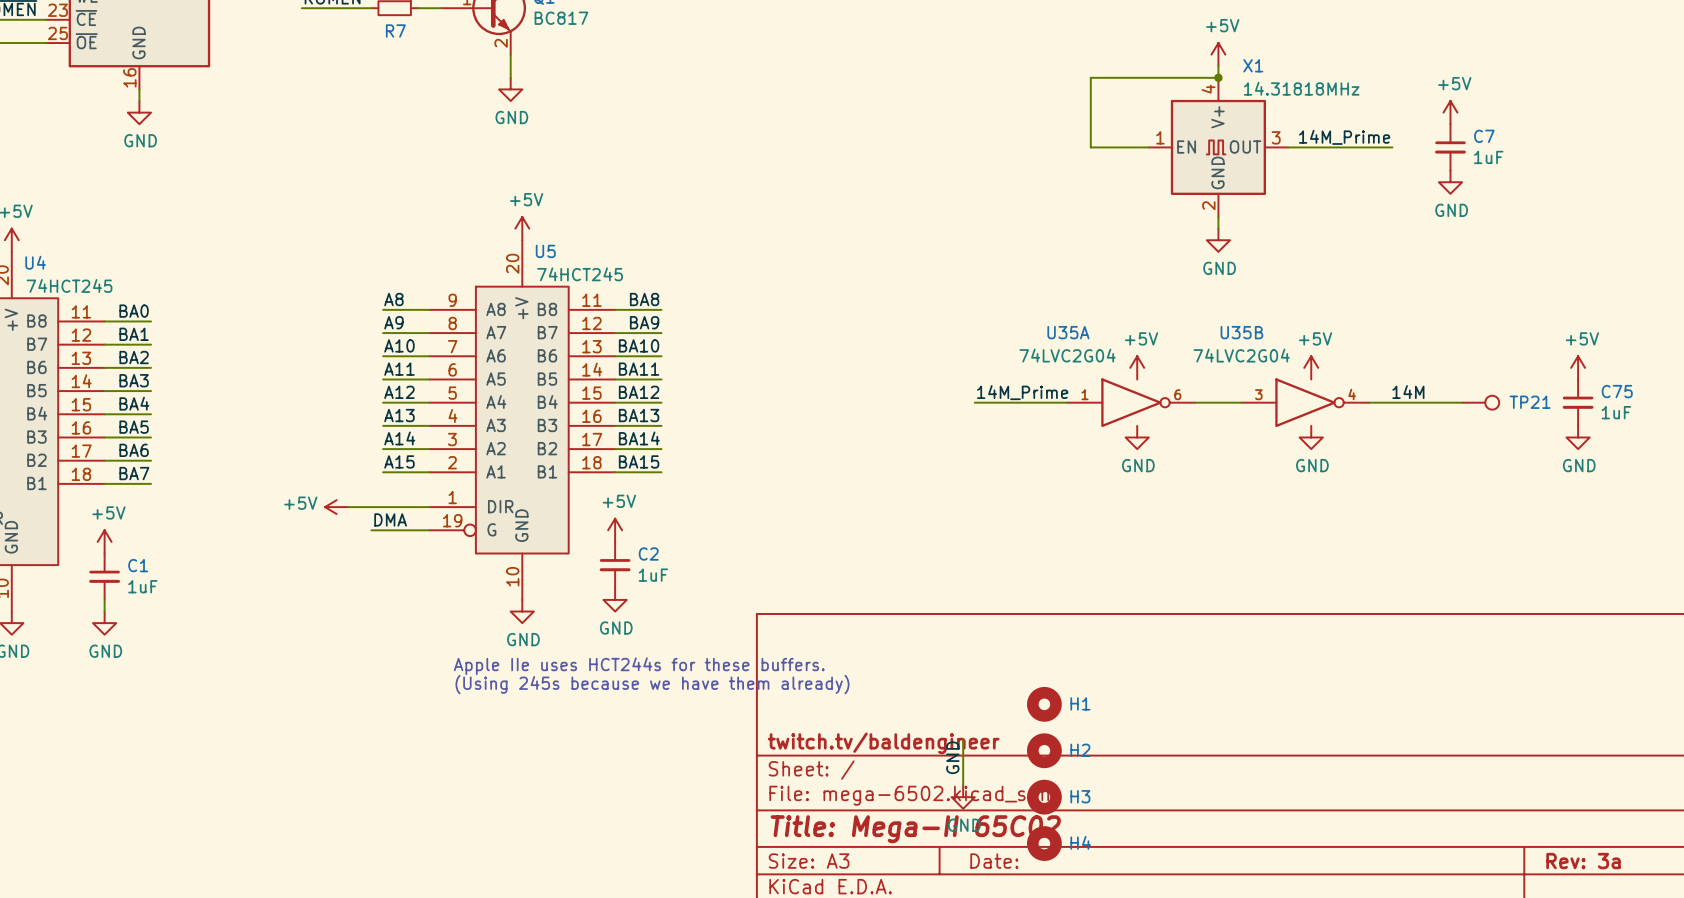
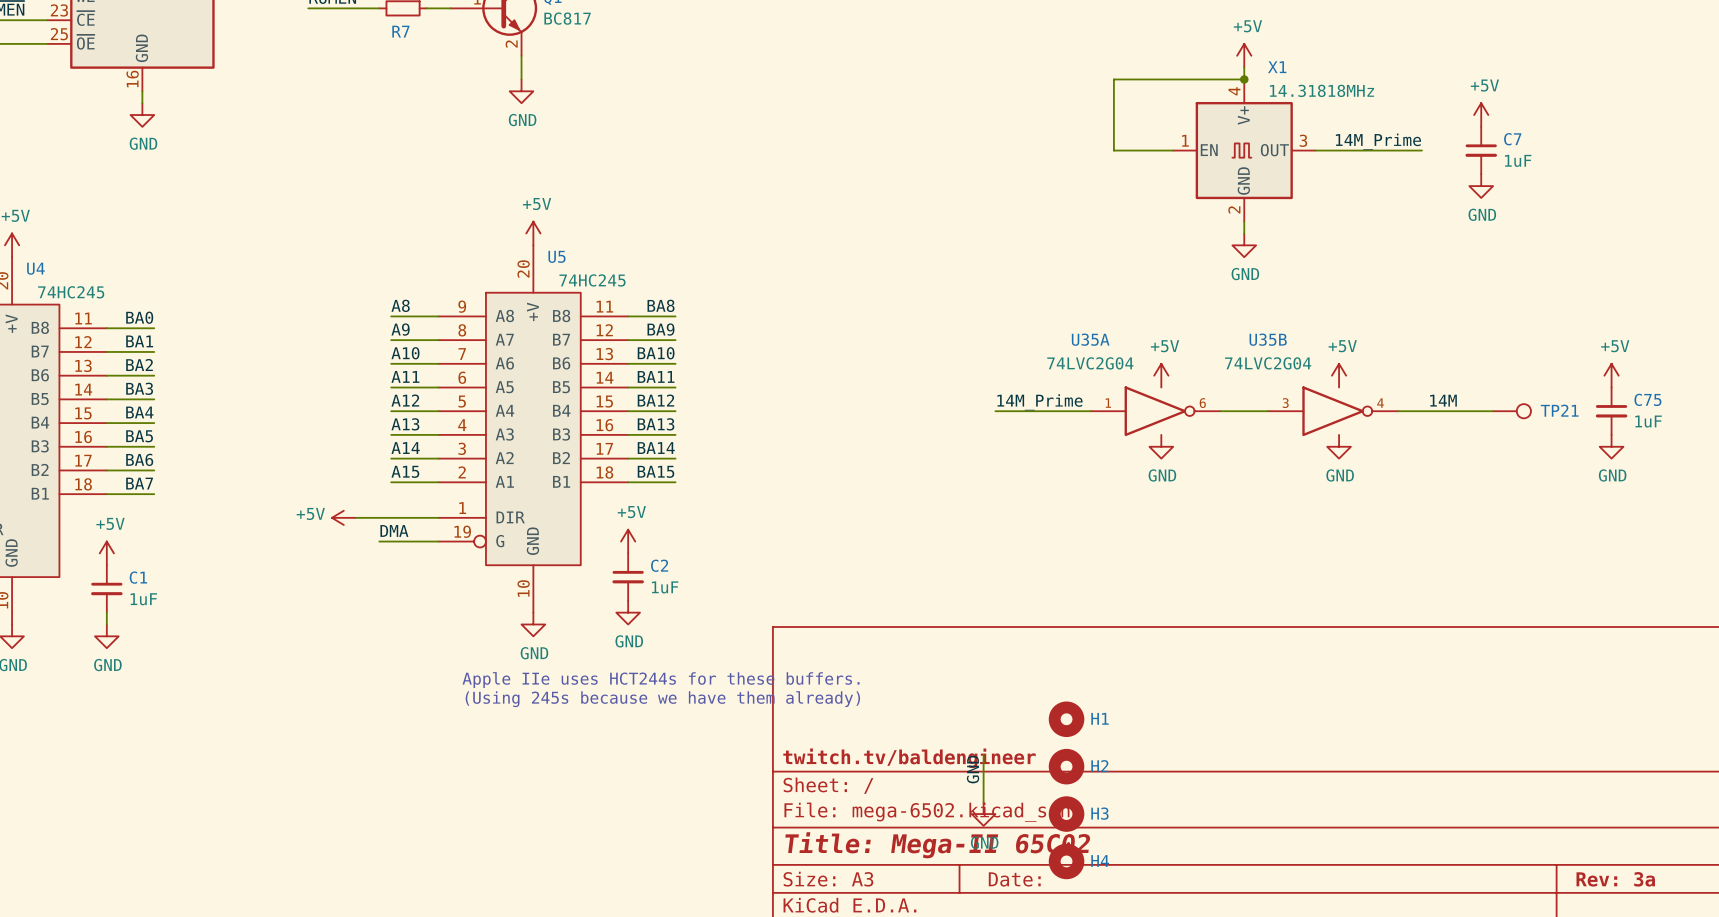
U5 value: 74HCT245 (580, 274) -> 74HC245 (592, 280)
U4 value: 74HCT245 (69, 285) -> 74HC245 (71, 292)

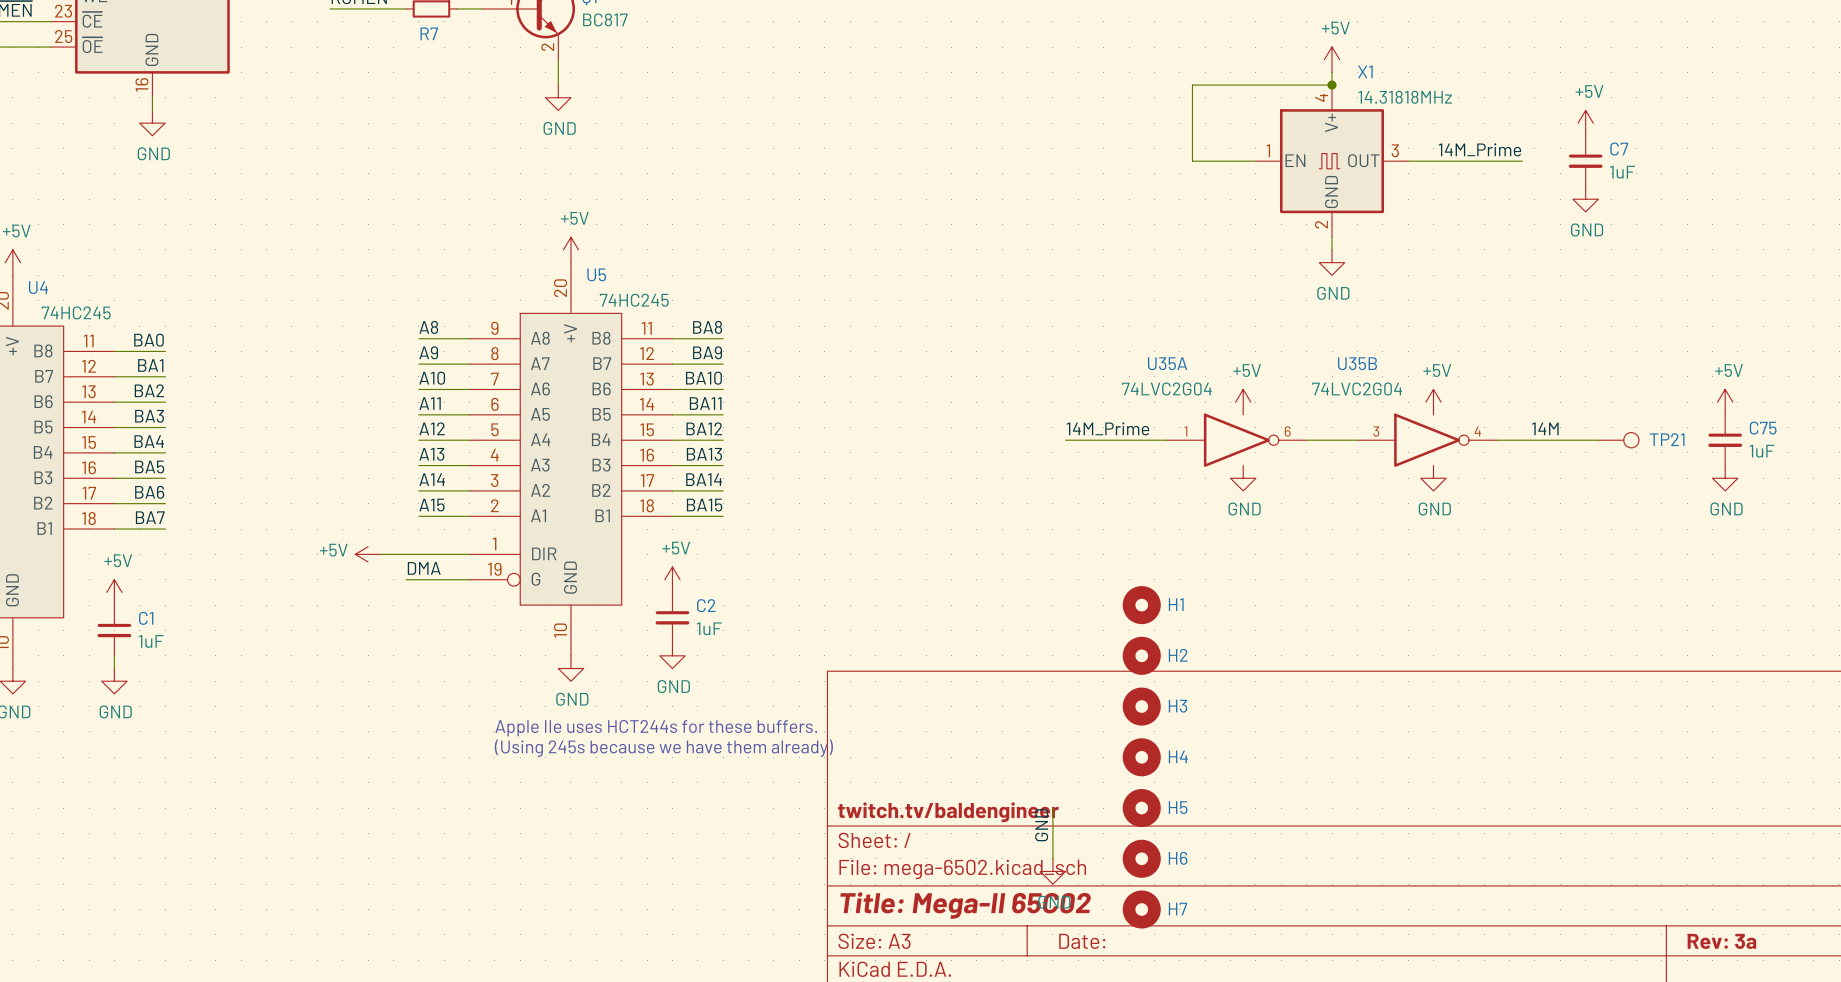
H1 position: (1066, 719) -> (1141, 605)
H5: none -> (1141, 808)
H2 position: (1066, 766) -> (1141, 655)
H6: none -> (1141, 858)
H3 position: (1066, 814) -> (1141, 706)
H7: none -> (1141, 909)
H4 position: (1066, 861) -> (1141, 757)

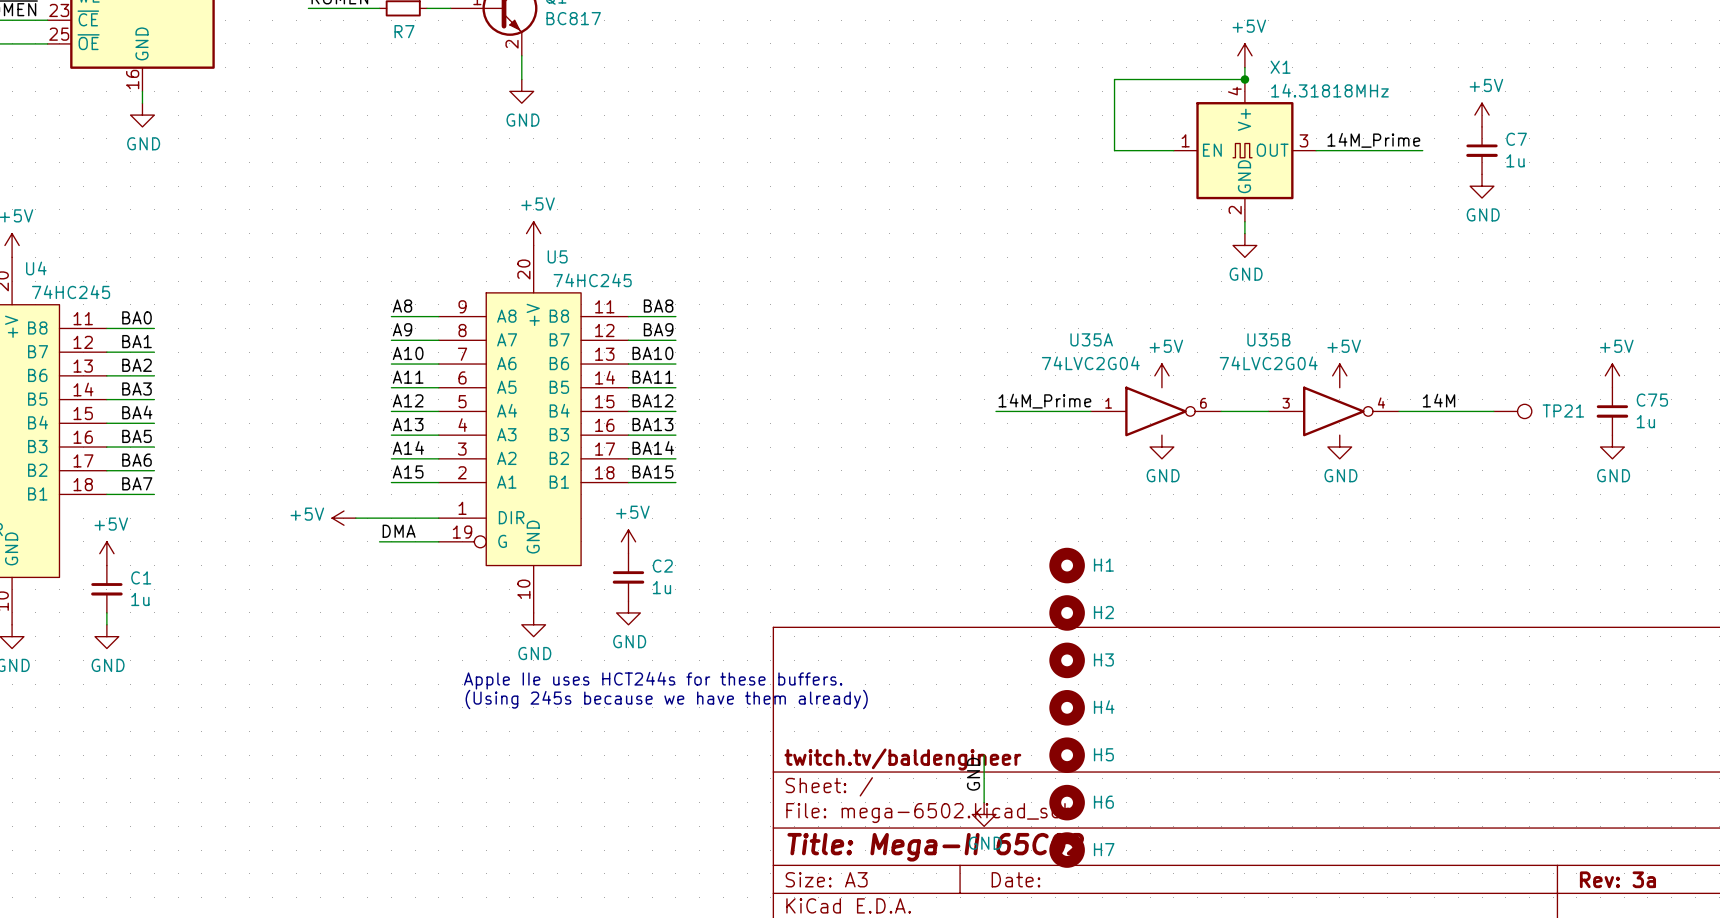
C7 value: 1uF (1622, 172) -> 1u (1515, 160)
C75 value: 1uF (1762, 451) -> 1u (1645, 421)
C2 value: 1uF (709, 628) -> 1u (661, 587)
C1 value: 1uF (151, 641) -> 1u (140, 599)

